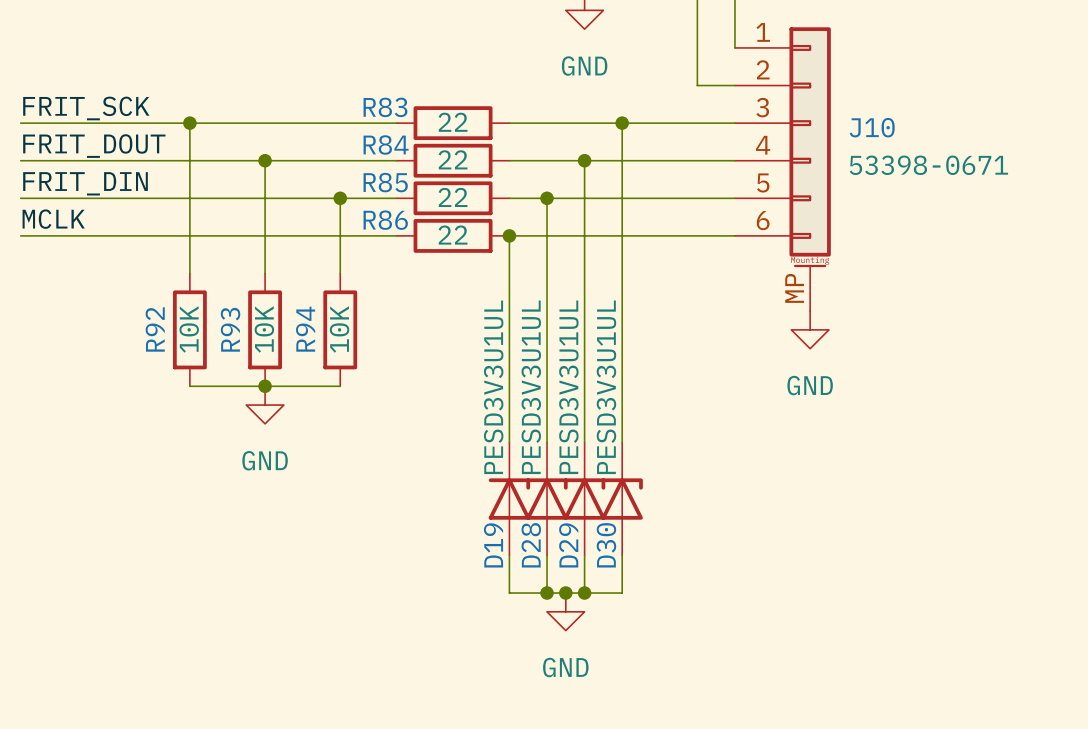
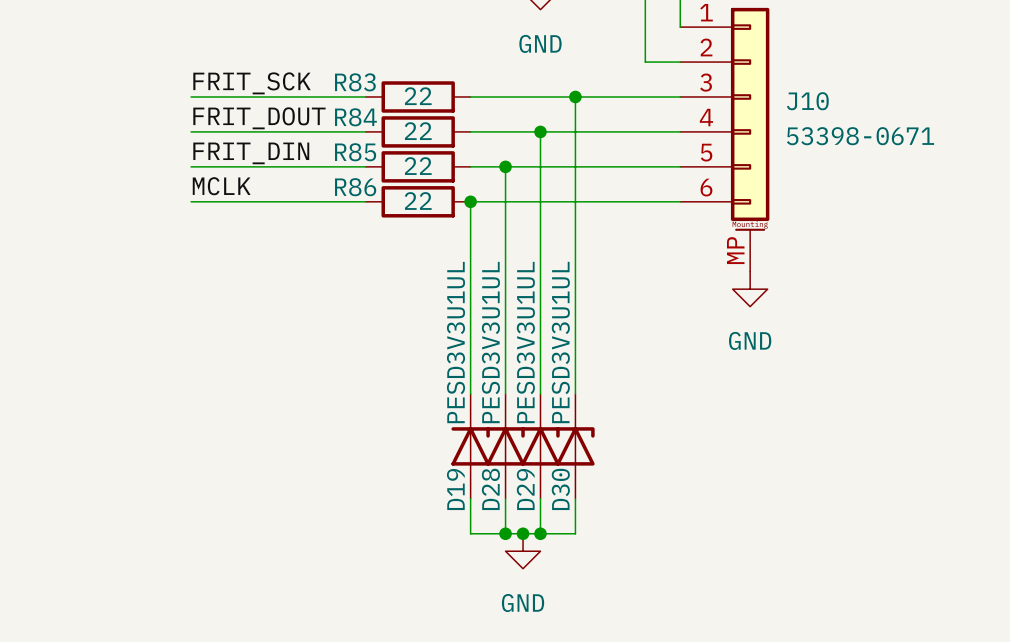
label position: FRIT_SCK (86, 108) -> FRIT_SCK (252, 83)
wire: (20, 123) (208, 123) -> none
wire: (189, 123) (189, 273) -> none
junction: (189, 123) -> none
label position: FRIT_DOUT (94, 146) -> FRIT_DOUT (259, 118)
wire: (20, 160) (208, 160) -> none
wire: (265, 160) (265, 273) -> none
junction: (265, 160) -> none
label position: FRIT_DIN (85, 183) -> FRIT_DIN (251, 153)
wire: (20, 198) (208, 198) -> none
wire: (340, 198) (340, 273) -> none
junction: (340, 198) -> none
label position: MCLK (53, 219) -> MCLK (221, 186)
wire: (20, 235) (208, 235) -> none
R92: 10K (189, 329) -> none
R93: 10K (265, 329) -> none
R94: 10K (340, 329) -> none
wire: (189, 386) (340, 386) -> none
junction: (265, 386) -> none
power symbol: GND (265, 405) -> none

